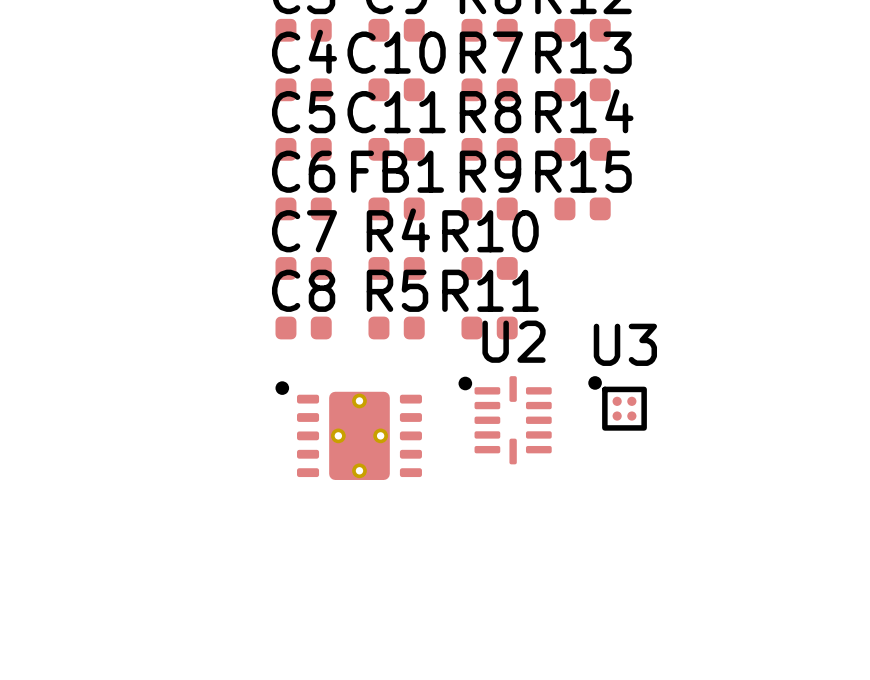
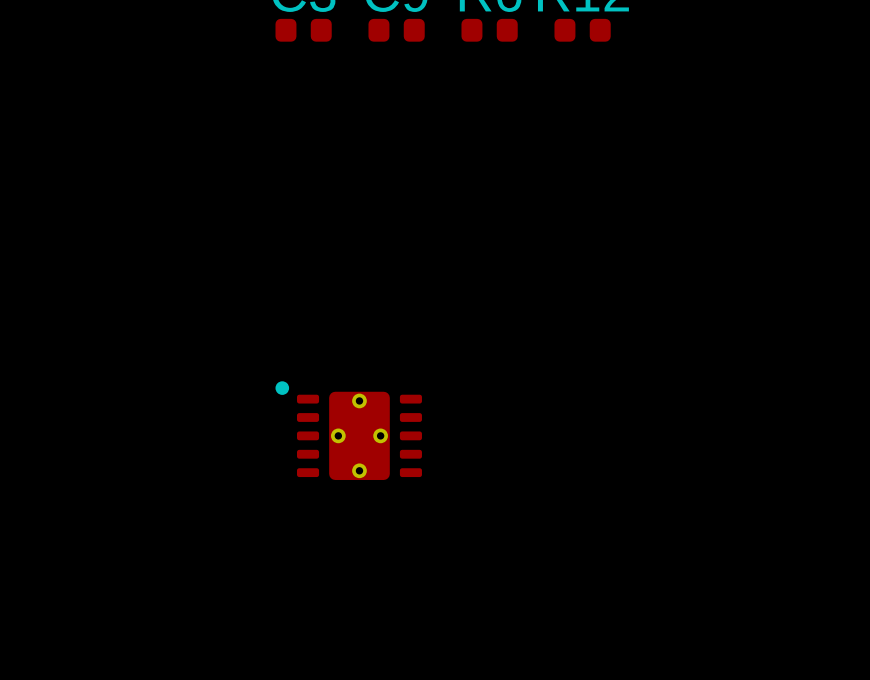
C4: (303, 89) -> none
C10: (396, 89) -> none
R7: (489, 89) -> none
R13: (582, 89) -> none
C5: (303, 149) -> none
C11: (396, 149) -> none
R8: (489, 149) -> none
R14: (582, 149) -> none
C6: (303, 208) -> none
FB1: (396, 208) -> none
R9: (489, 208) -> none
R15: (582, 208) -> none
C7: (303, 268) -> none
R4: (396, 268) -> none
R10: (489, 268) -> none
C8: (303, 328) -> none
R5: (396, 328) -> none
R11: (489, 328) -> none
U3: (617, 403) -> none
U2: (505, 420) -> none

